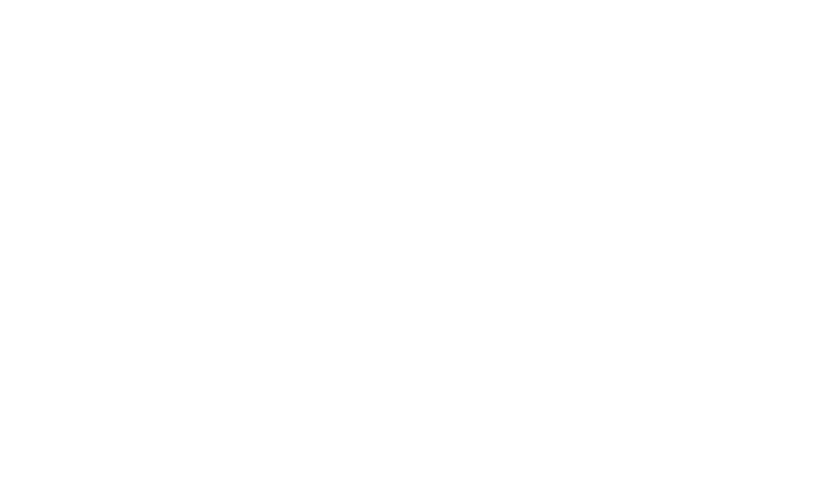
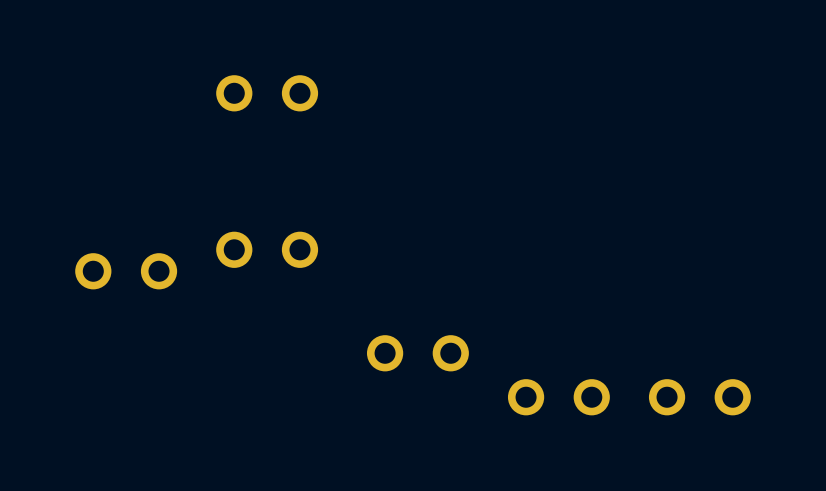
part: none -> (267, 93)
part: none -> (267, 249)
part: none -> (126, 271)
part: none -> (417, 353)
part: none -> (558, 397)
part: none -> (699, 397)

